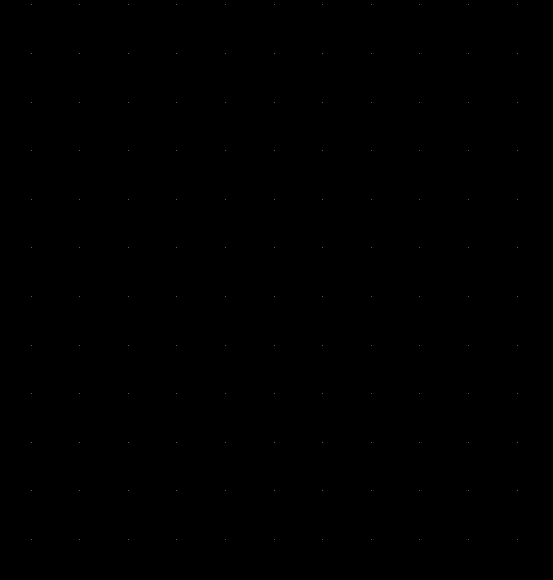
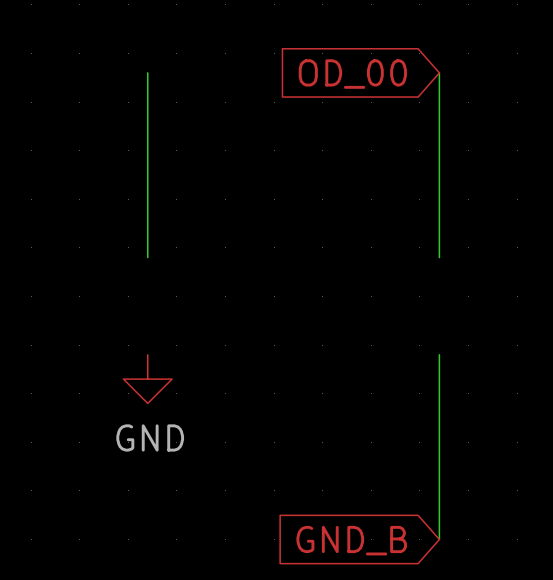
wire: none -> (147, 72) (147, 257)
wire: none -> (439, 72) (439, 257)
global label: none -> OD_00 (352, 74)
wire: none -> (439, 354) (439, 539)
power symbol: none -> GND (147, 379)
global label: none -> GND_B (351, 540)

